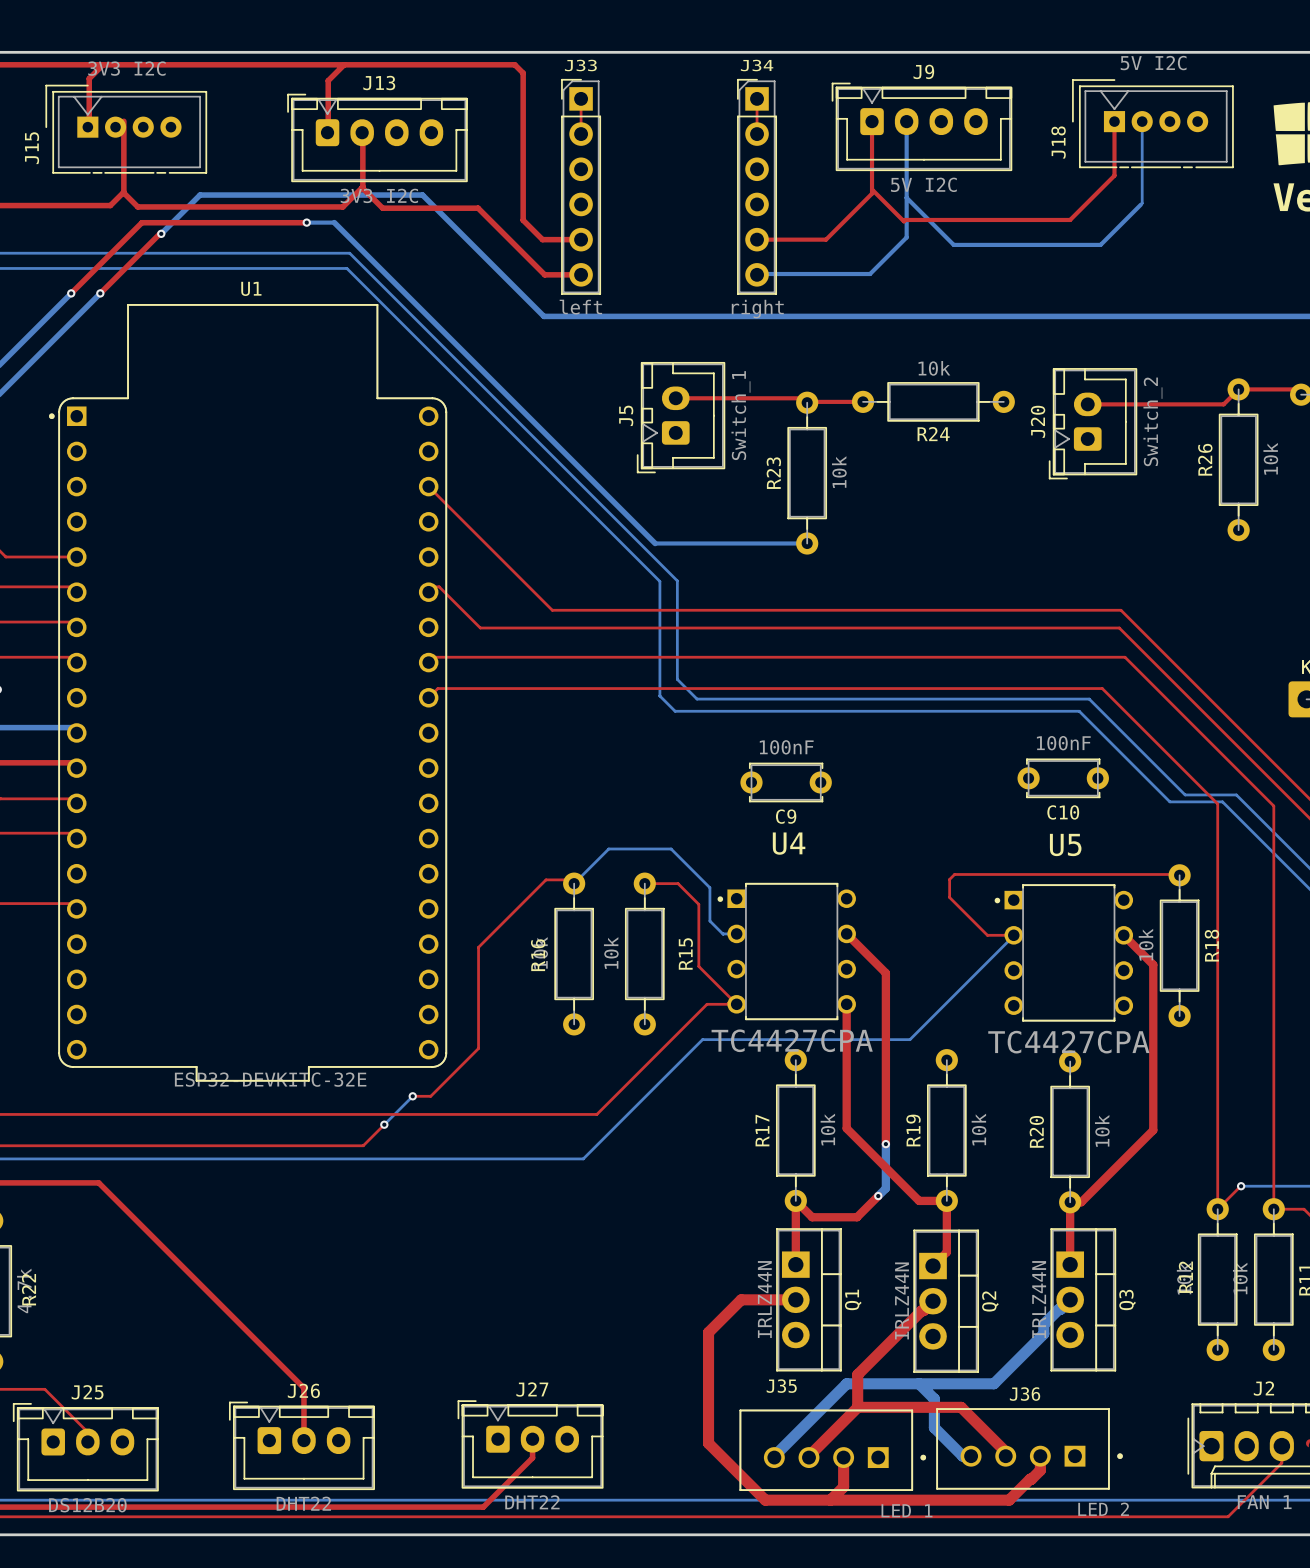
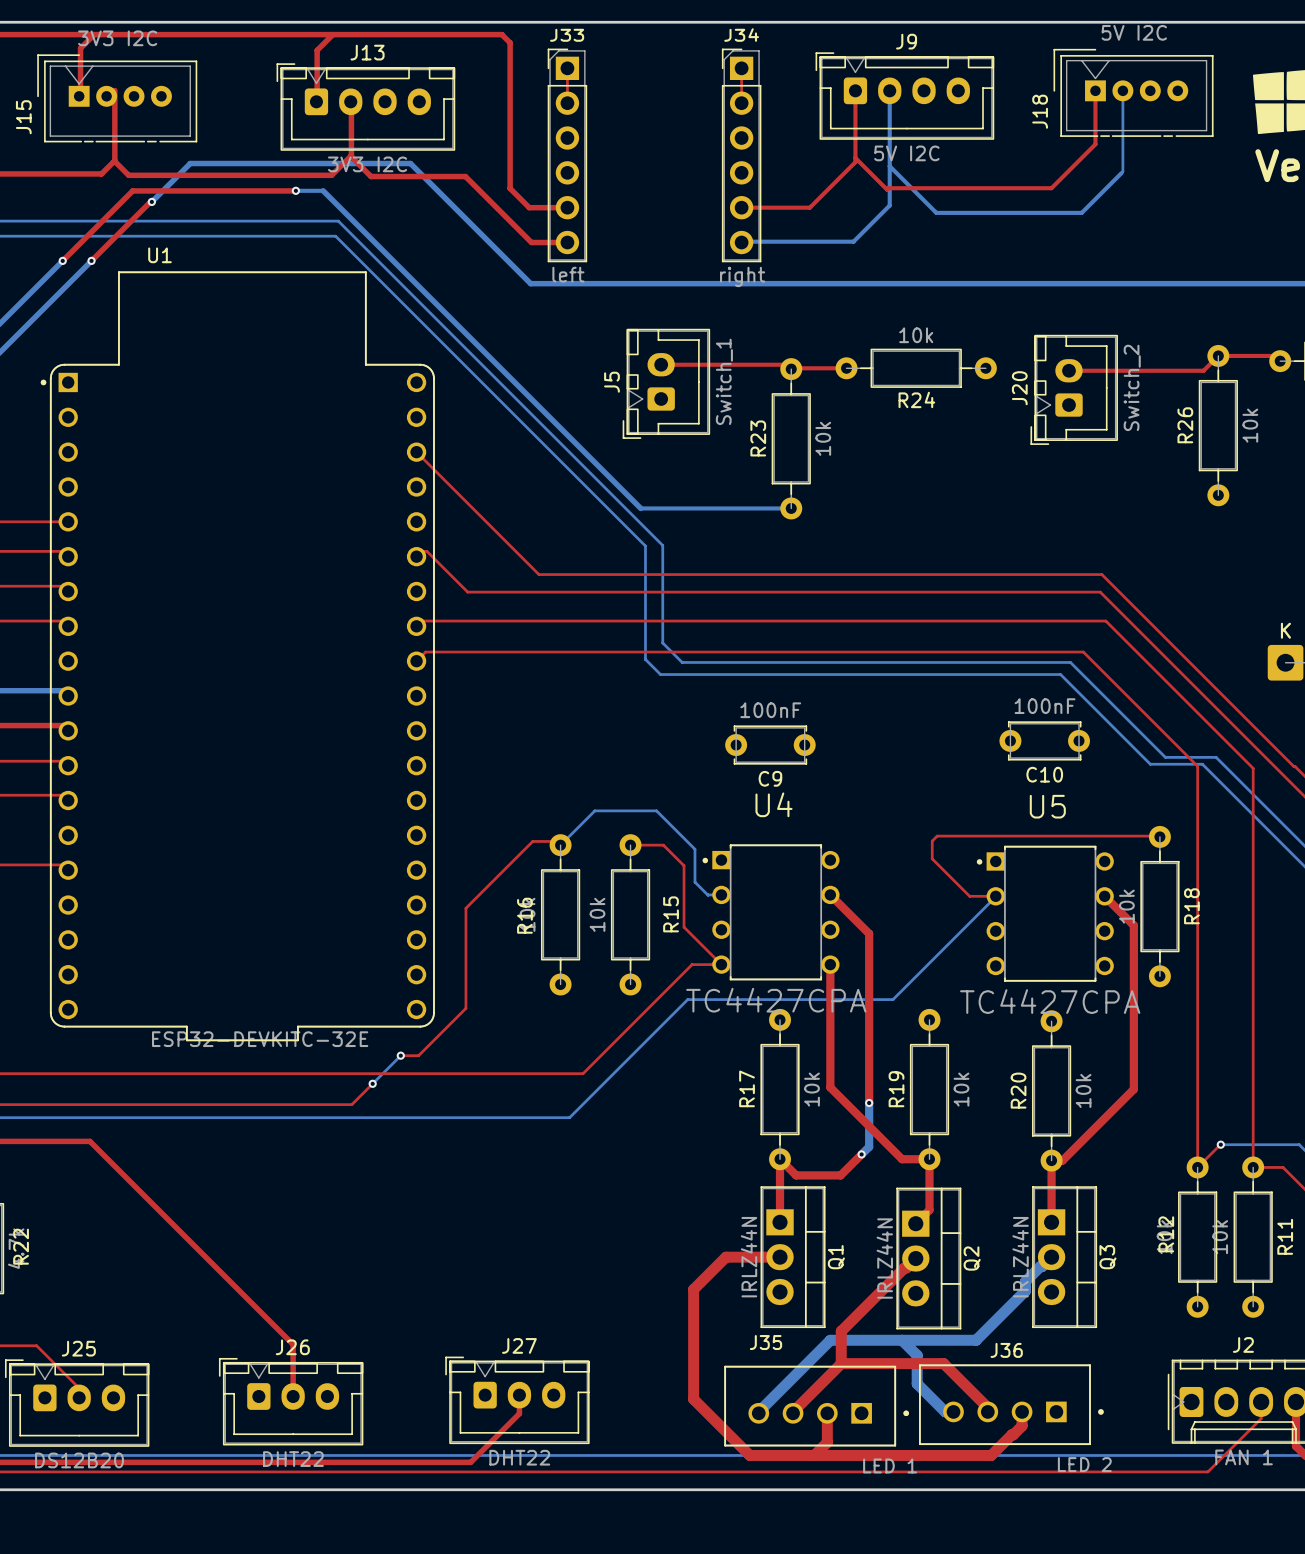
U1 name position: U1 (251, 288) -> U1 (159, 255)

